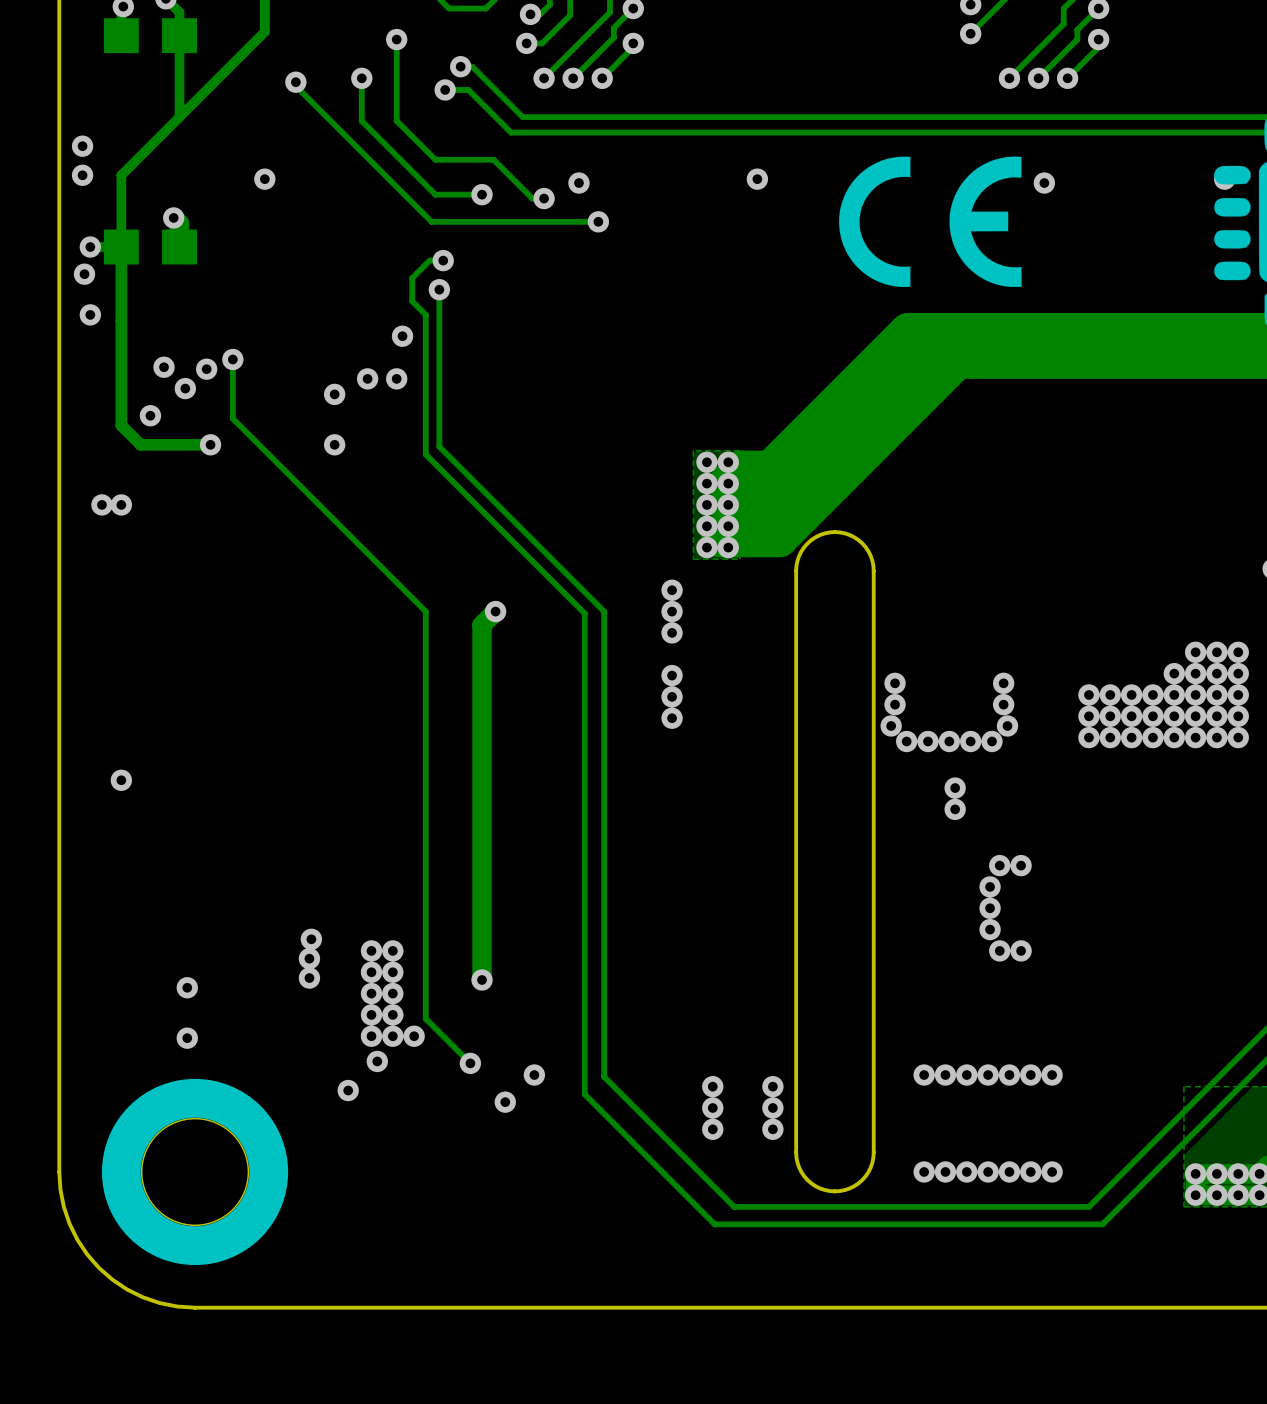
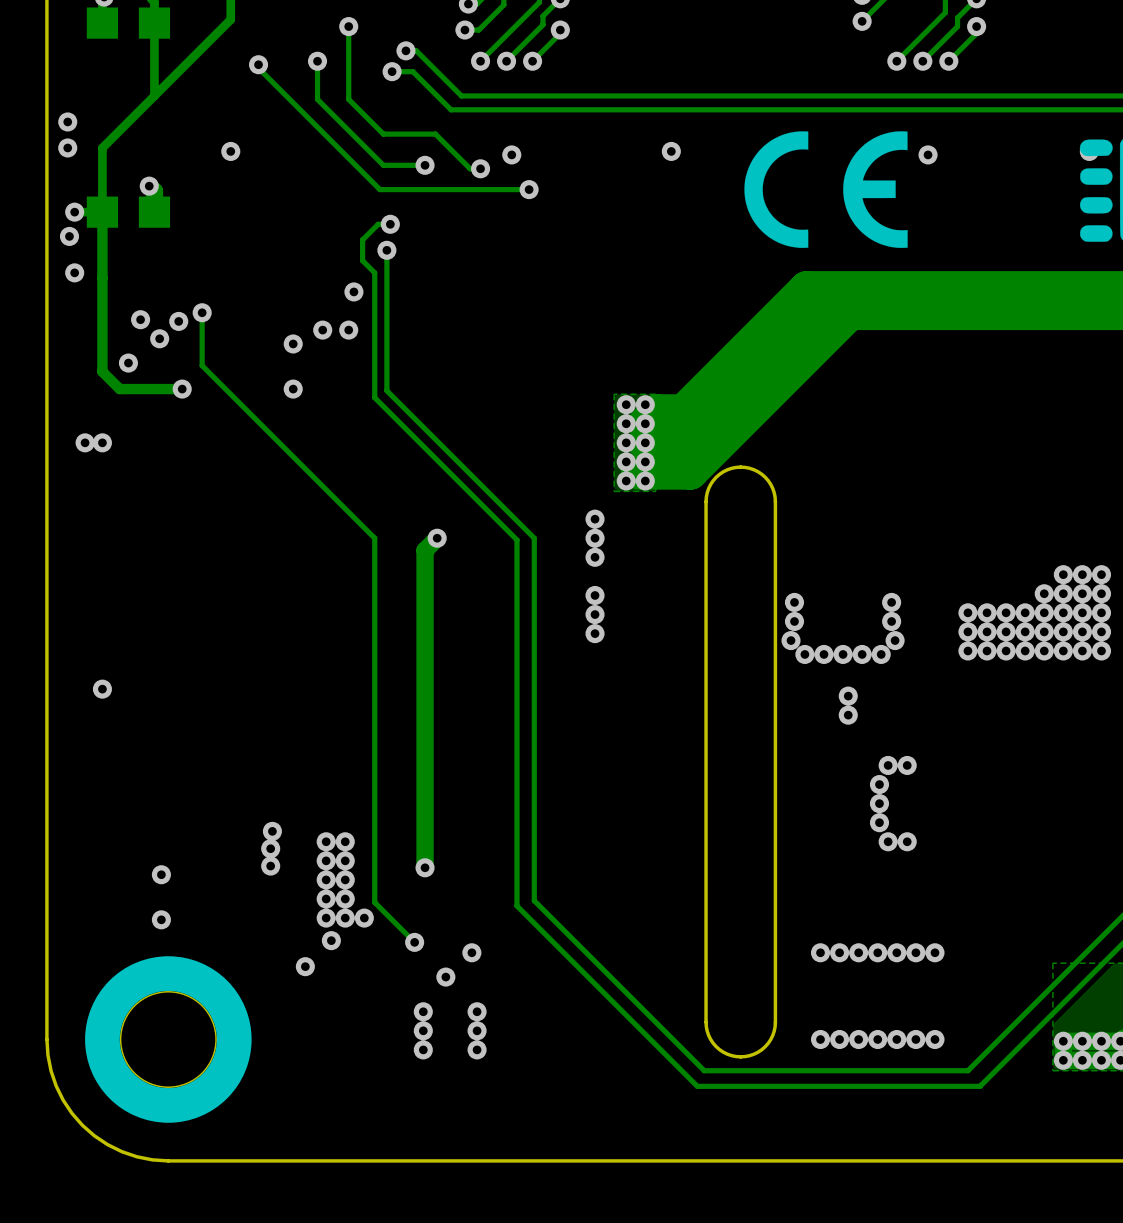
track: (604, 1016) (604, 1076) (734, 1206) (794, 1206) -> (534, 900) (704, 1070)
track: (584, 1022) (584, 1094) (714, 1224) (786, 1224) -> (516, 905) (697, 1086)
via: (712, 1086) -> none
via: (772, 1086) -> none
via: (712, 1107) -> none
via: (772, 1107) -> none
via: (712, 1129) -> none
via: (772, 1129) -> none
via: none -> (423, 1011)
via: none -> (477, 1011)
via: none -> (423, 1030)
via: none -> (477, 1030)
via: none -> (423, 1049)
via: none -> (477, 1049)

